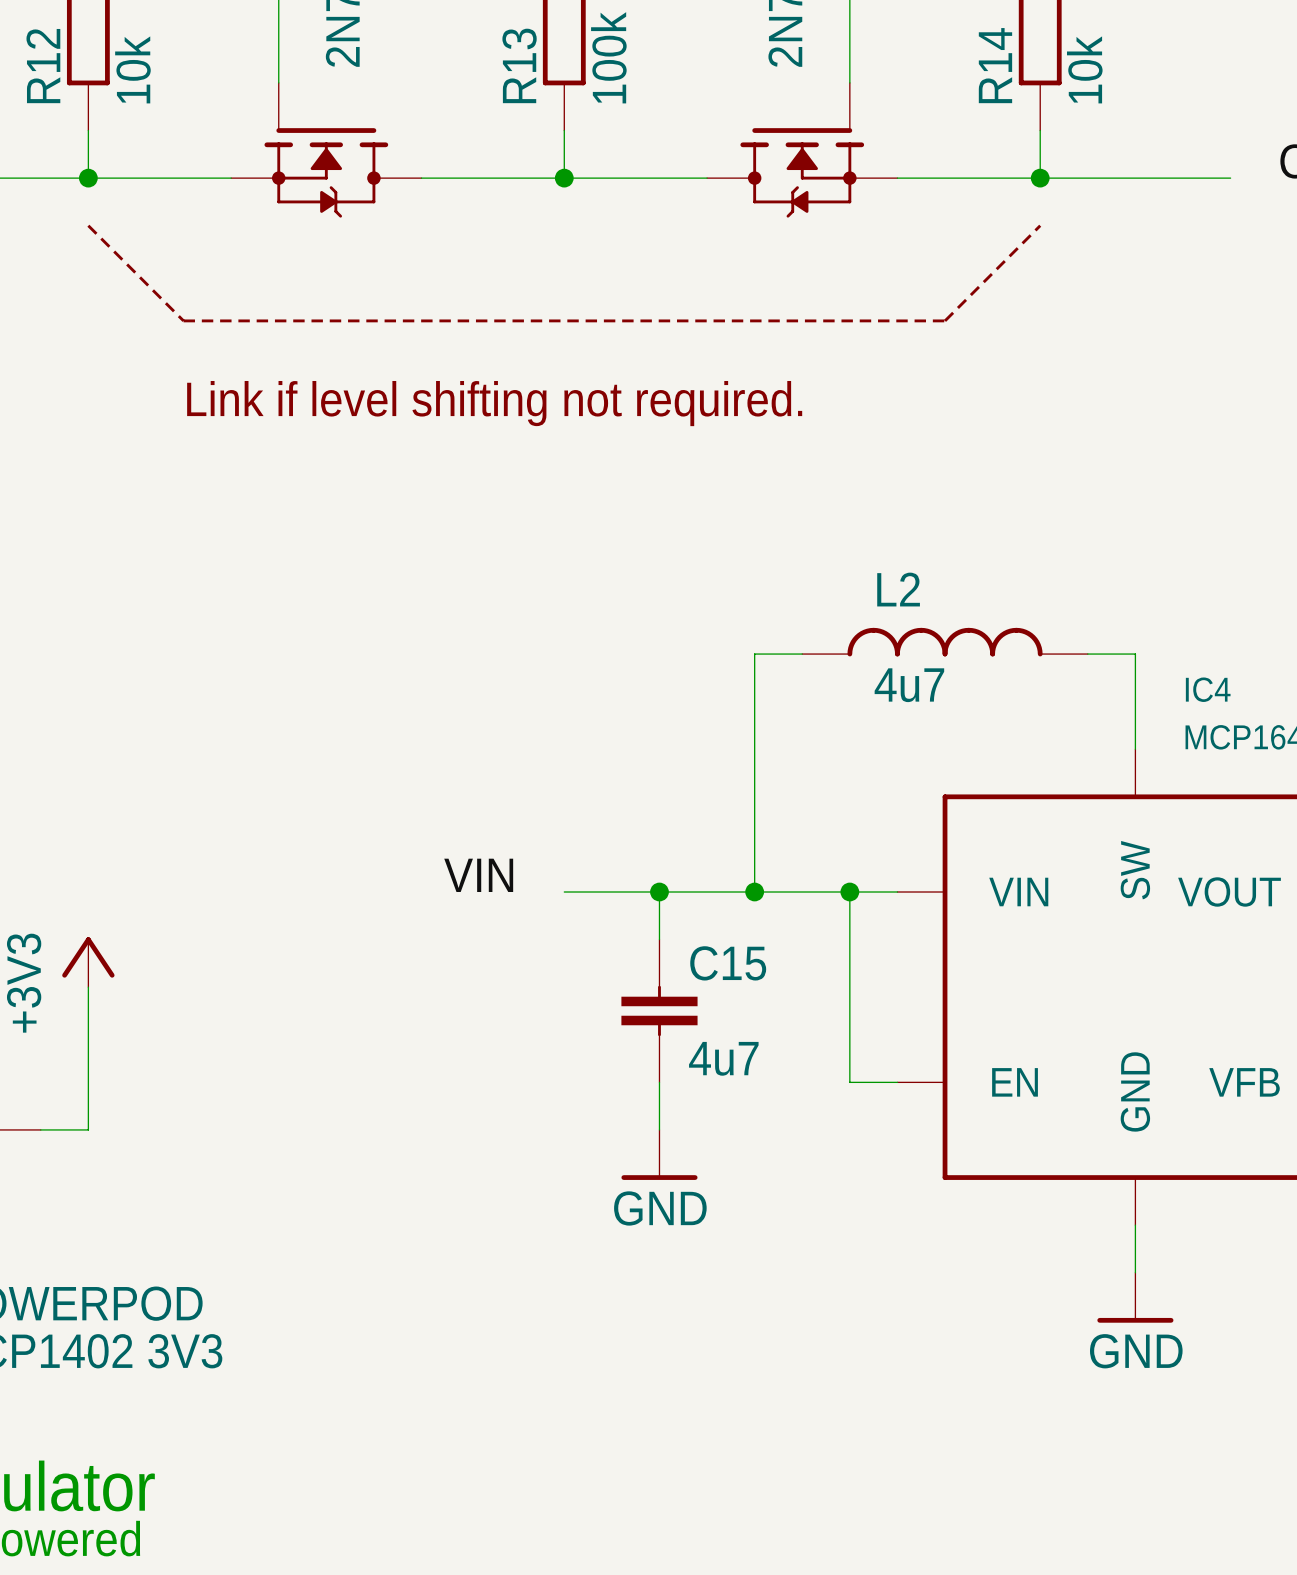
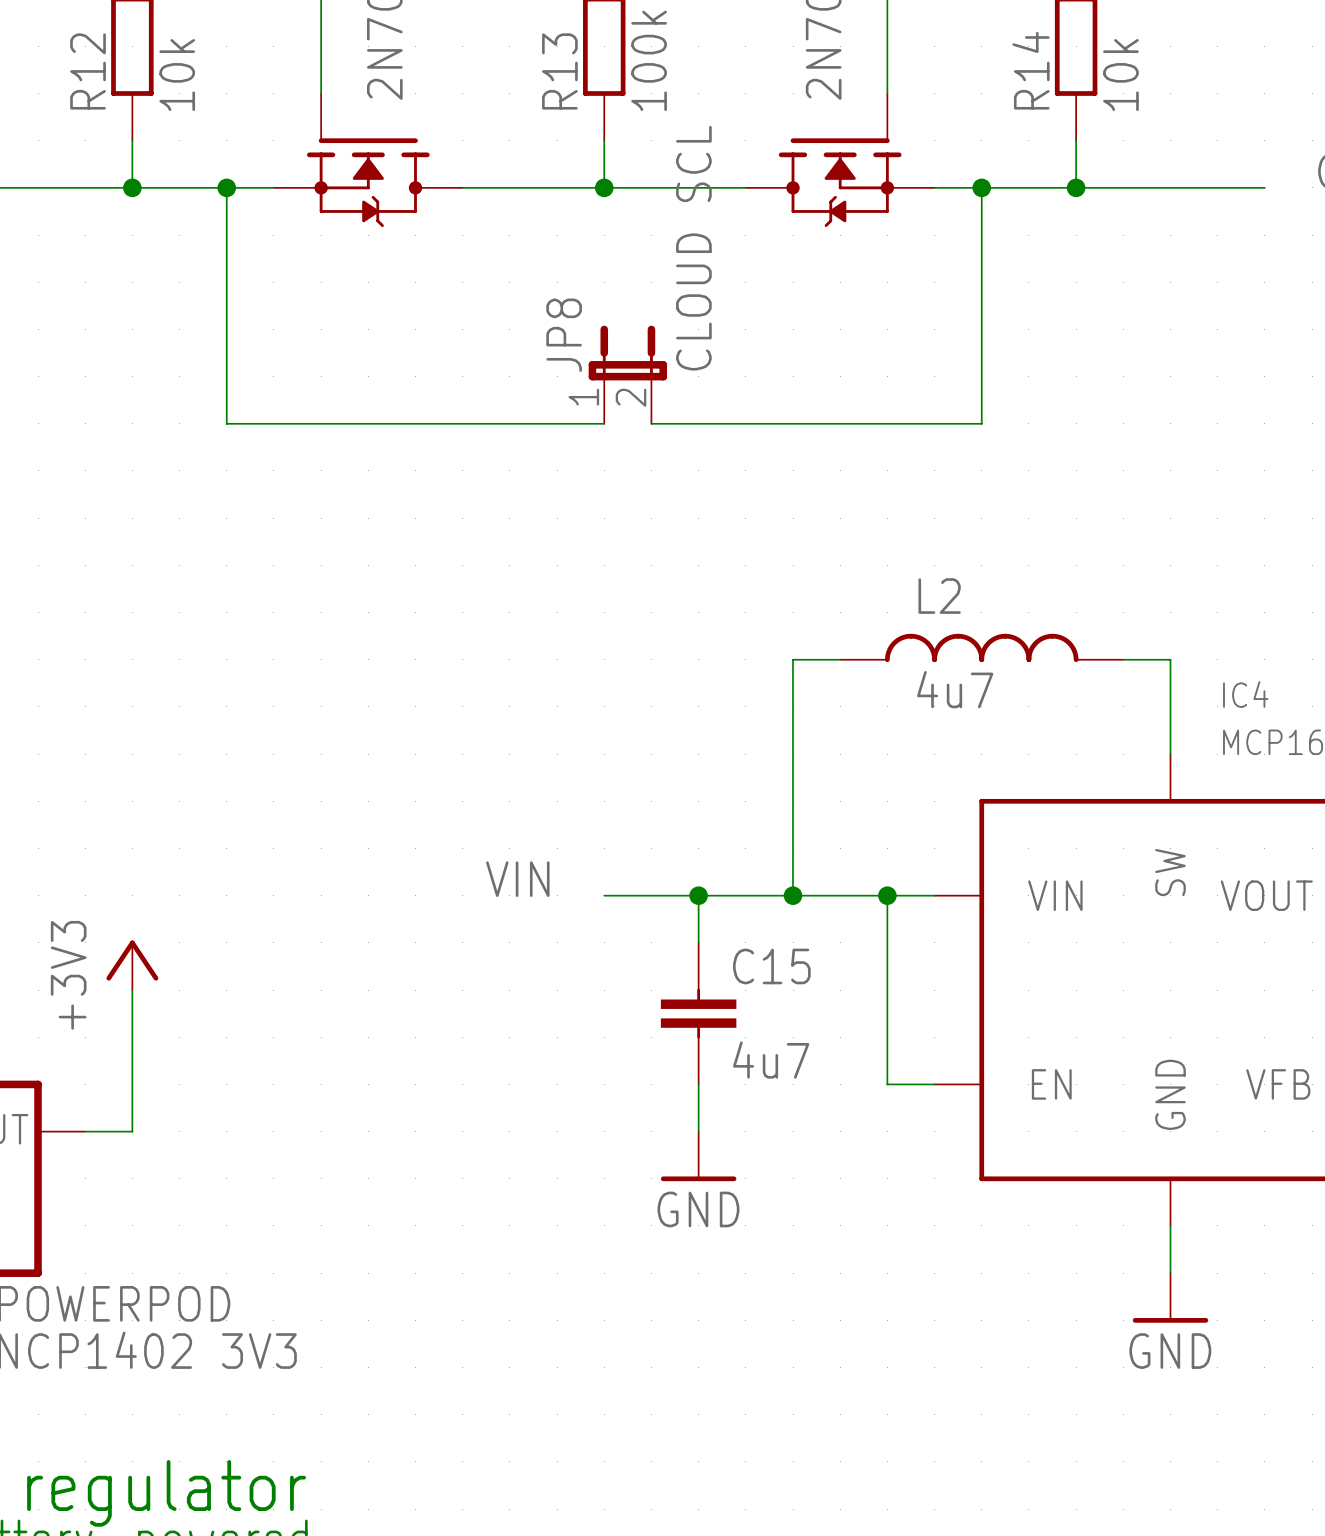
wire: none -> (226, 187) (226, 423) (604, 423)
junction: none -> (226, 187)
wire: none -> (981, 187) (981, 423) (651, 423)
junction: none -> (981, 187)
line: (88, 225) (183, 320) (945, 320) (1040, 225) -> none
JP8: none -> CLOUD SCL (627, 374)
text: Link if level shifting not required. (494, 403) -> none

